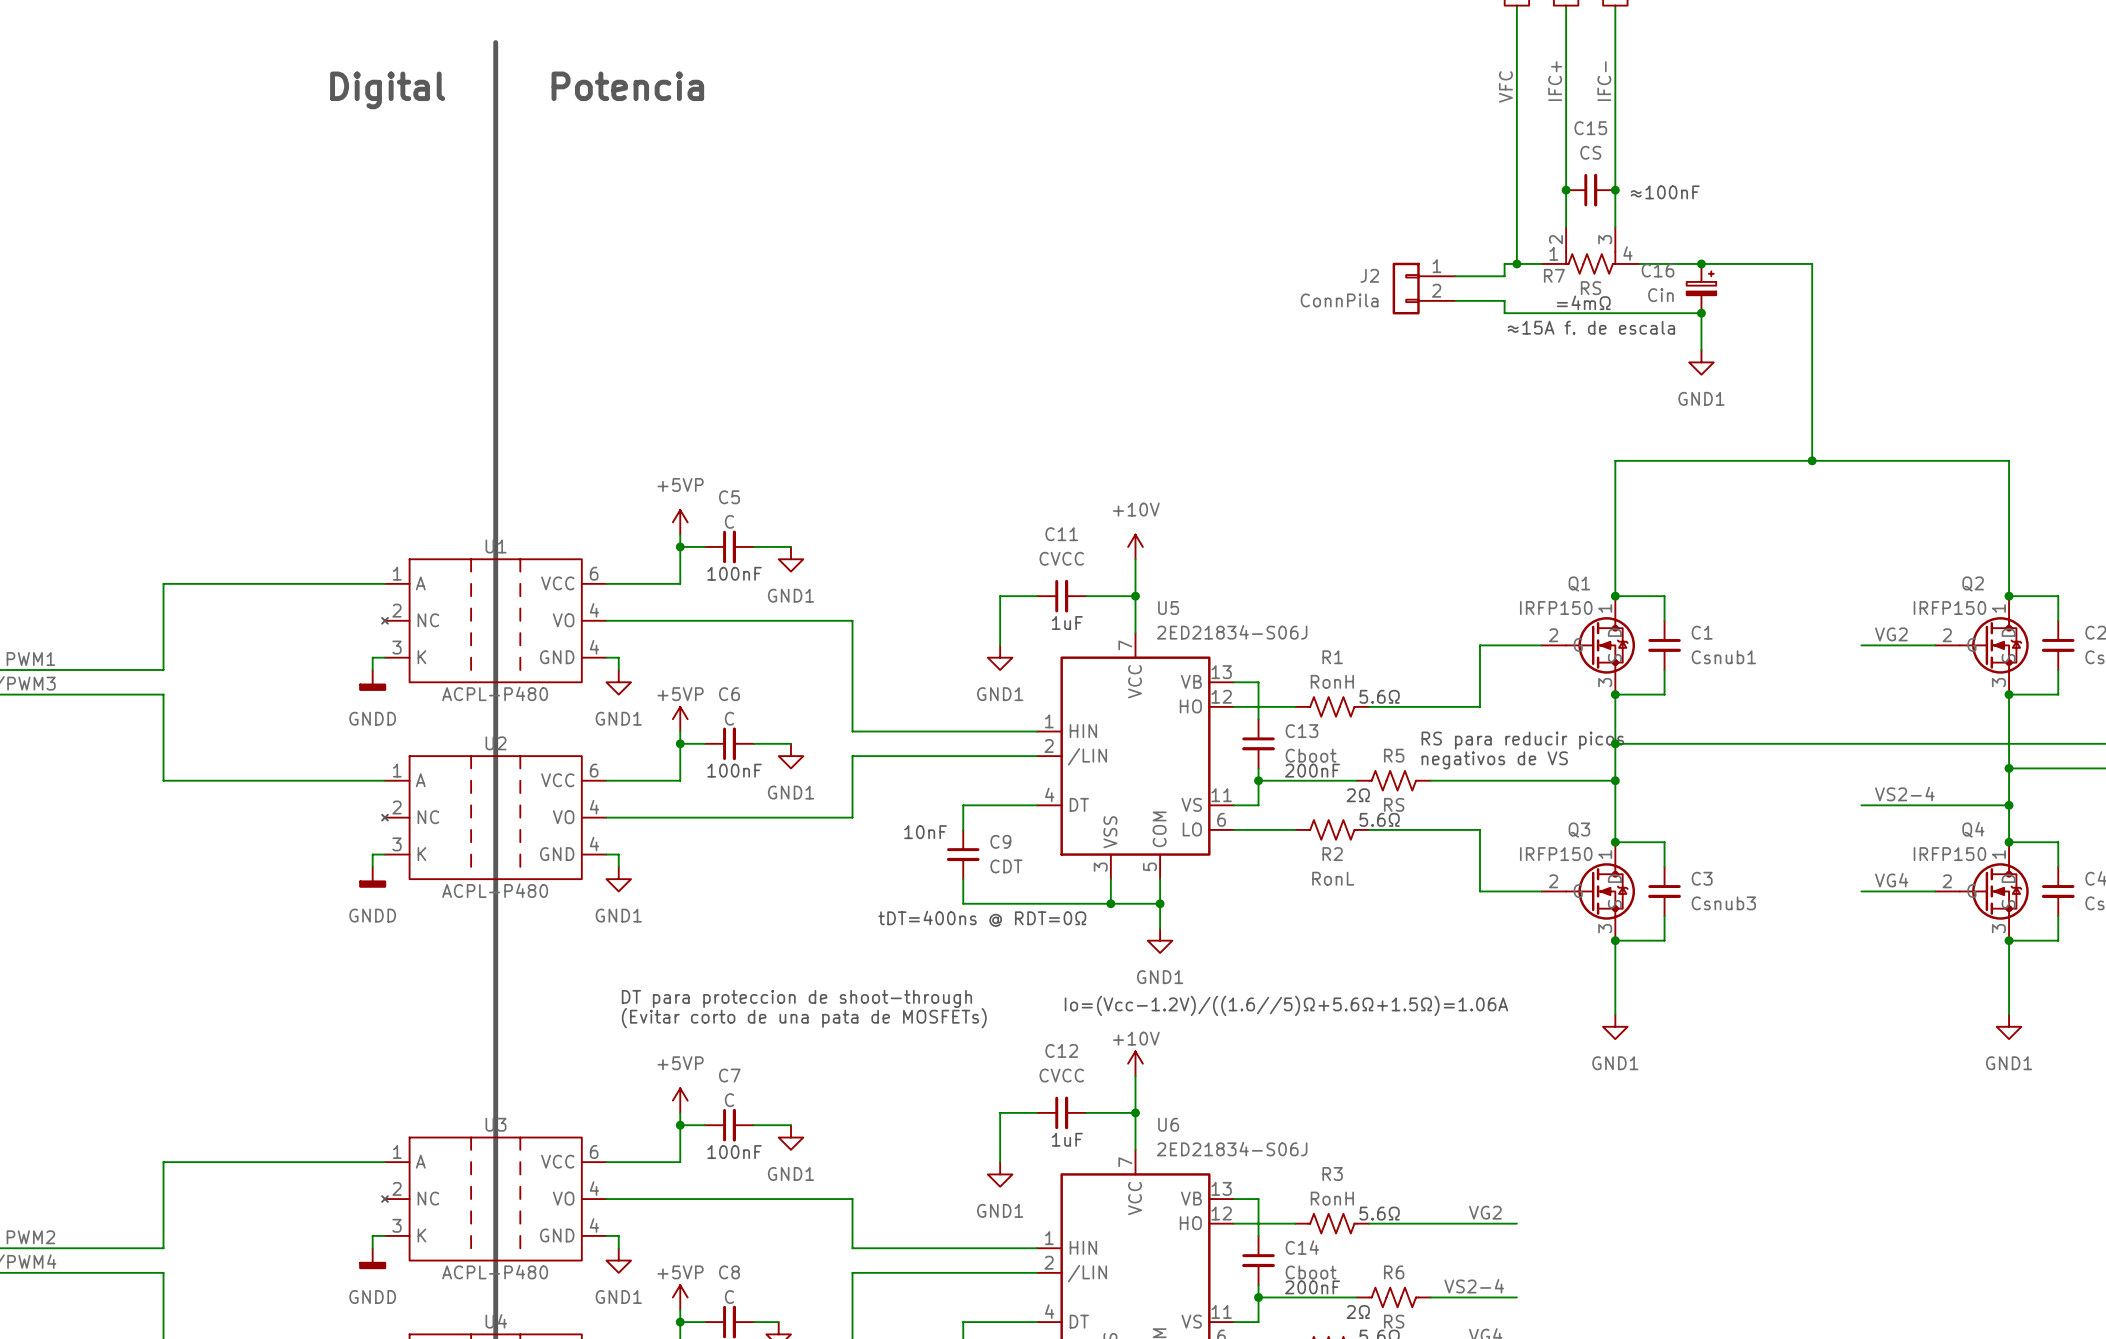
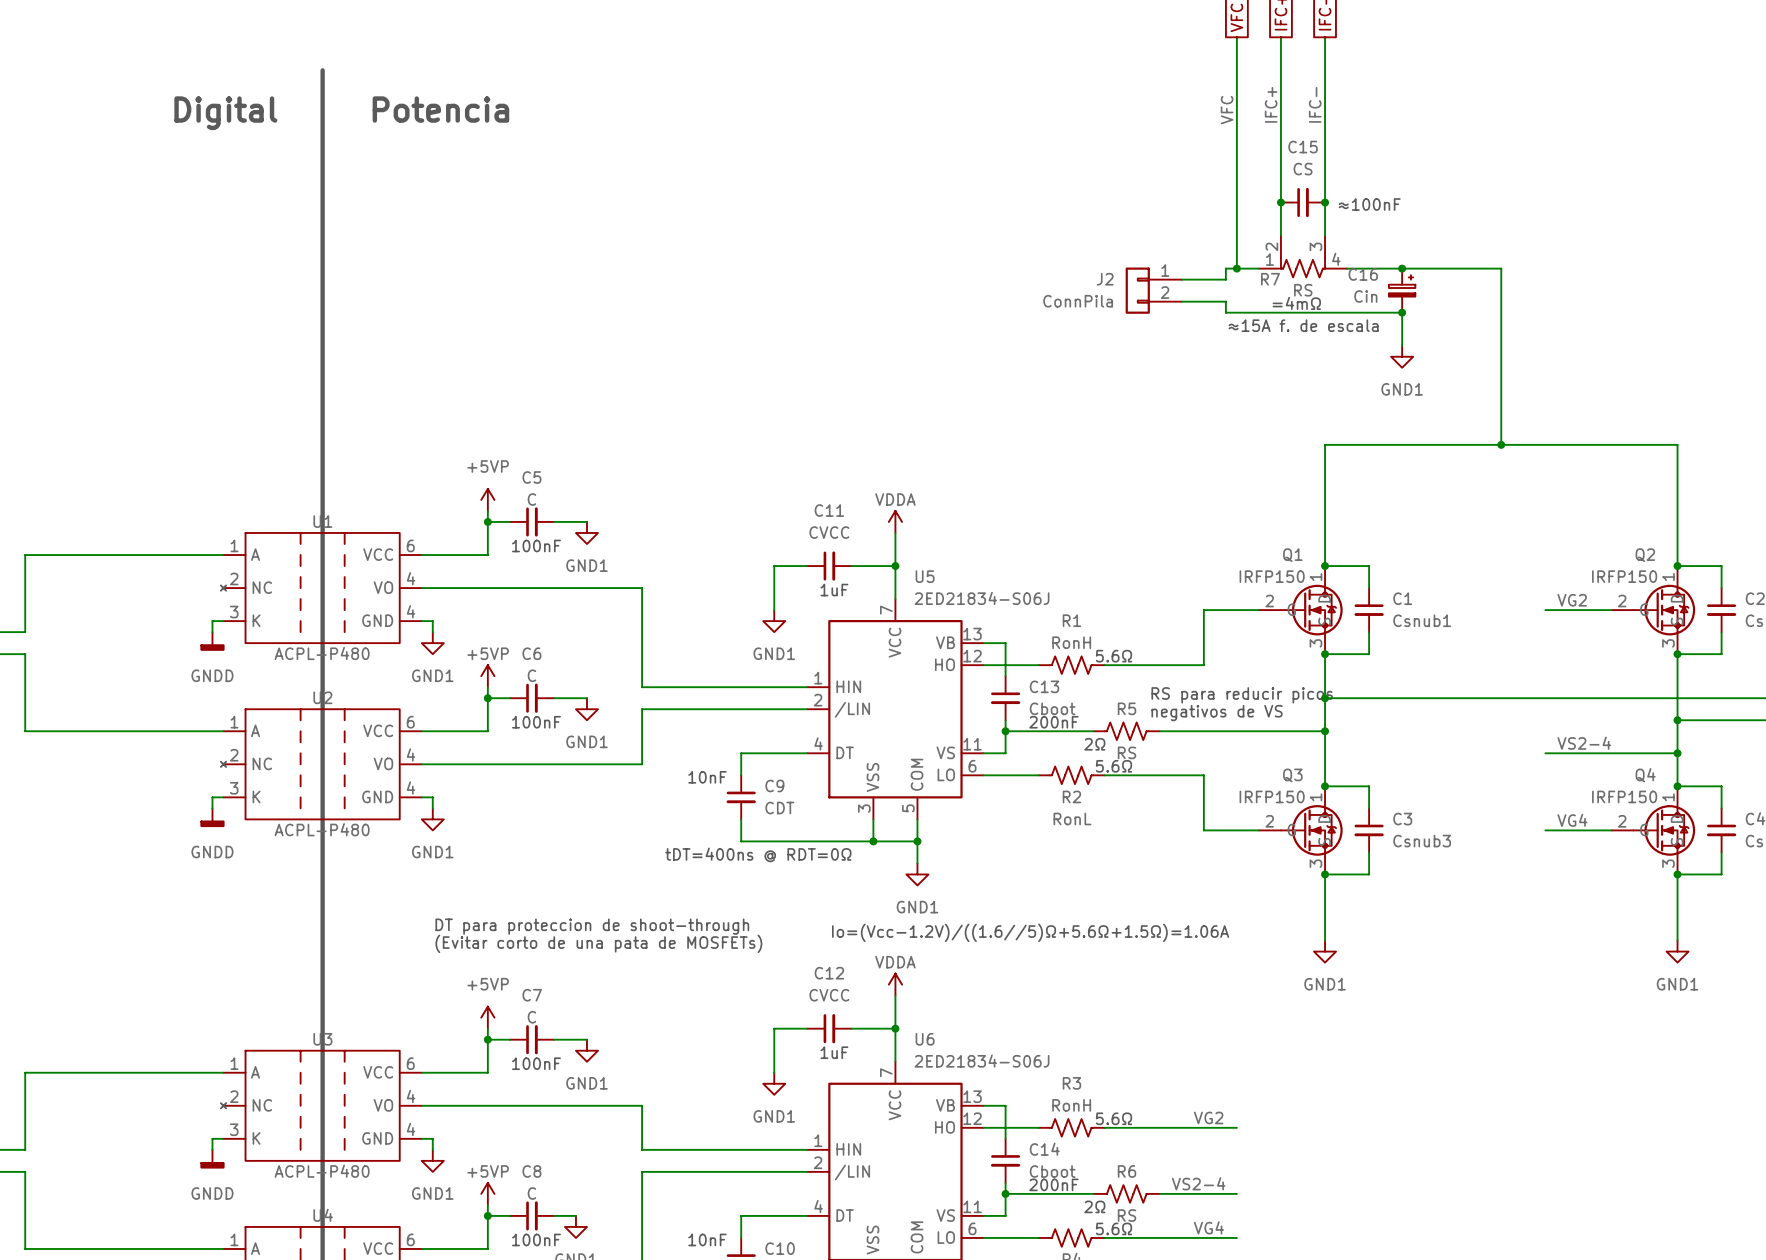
power symbol: +10V (1135, 546) -> VDDA (895, 521)
power symbol: +10V (1135, 1063) -> VDDA (895, 984)

